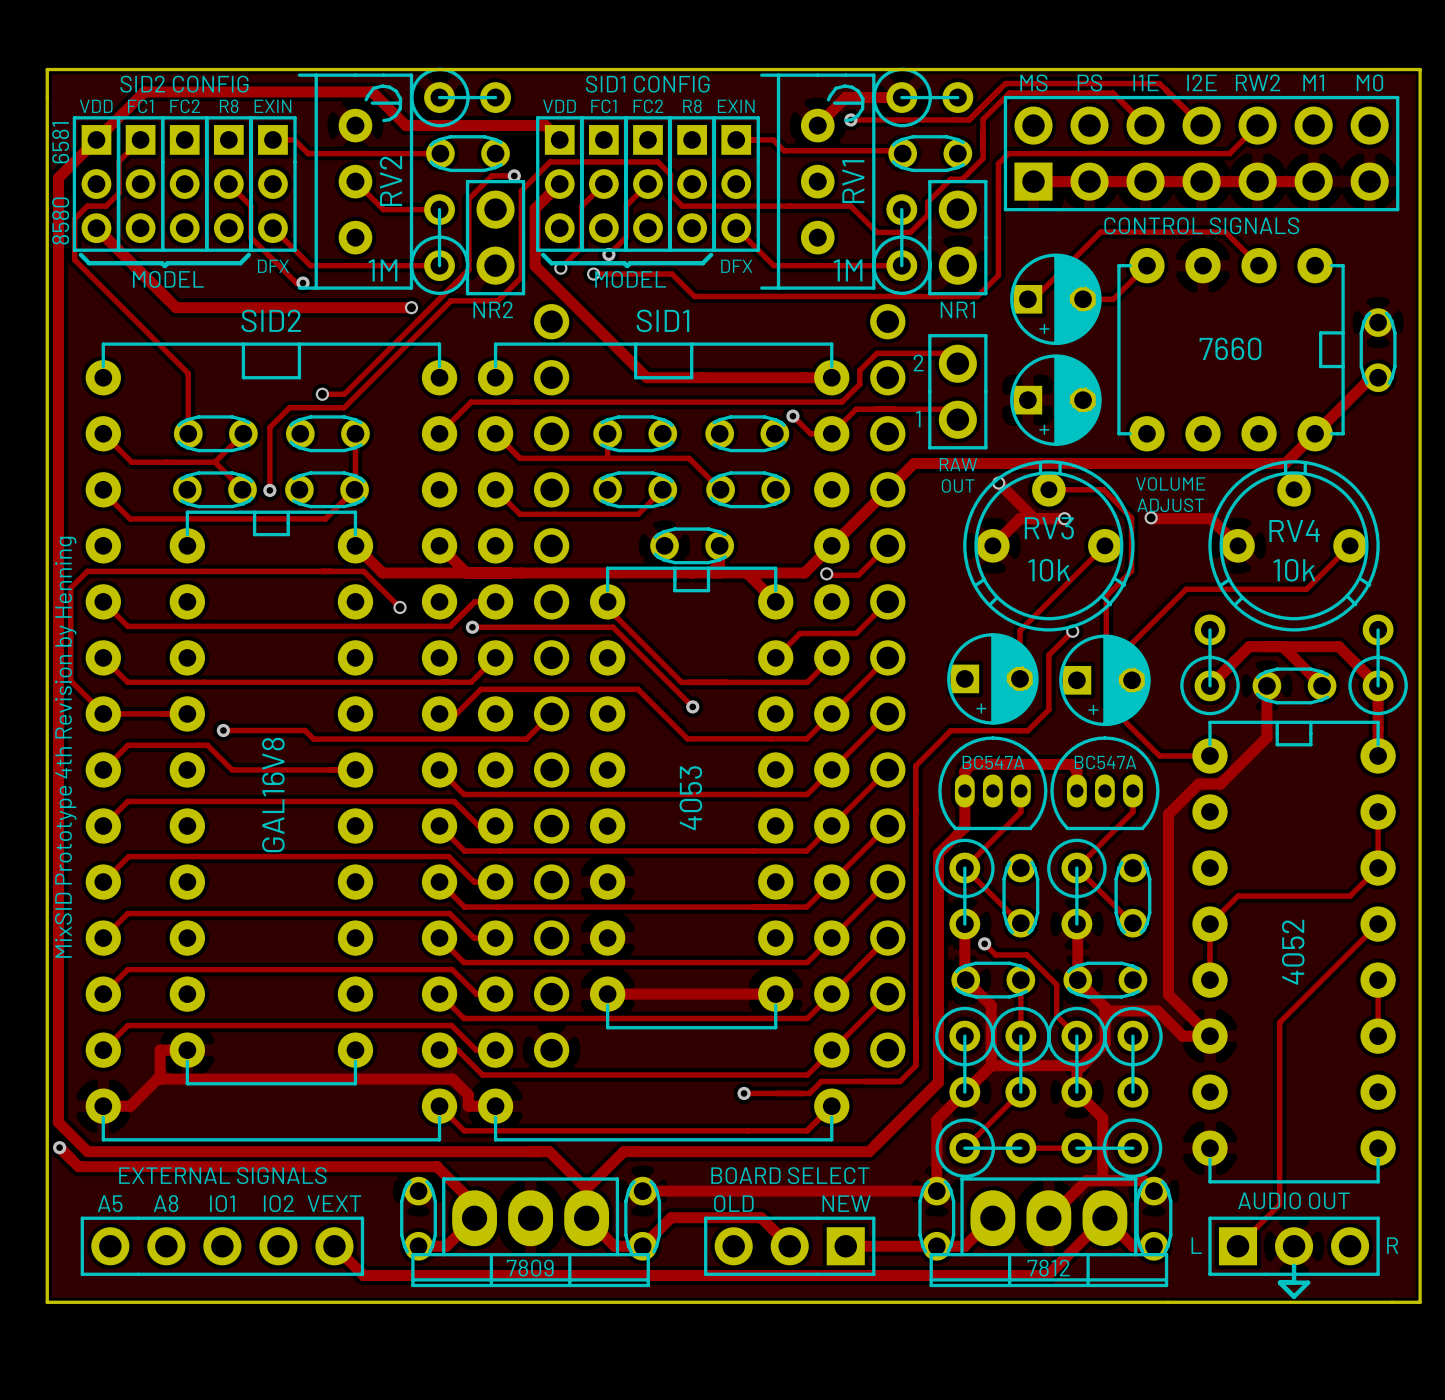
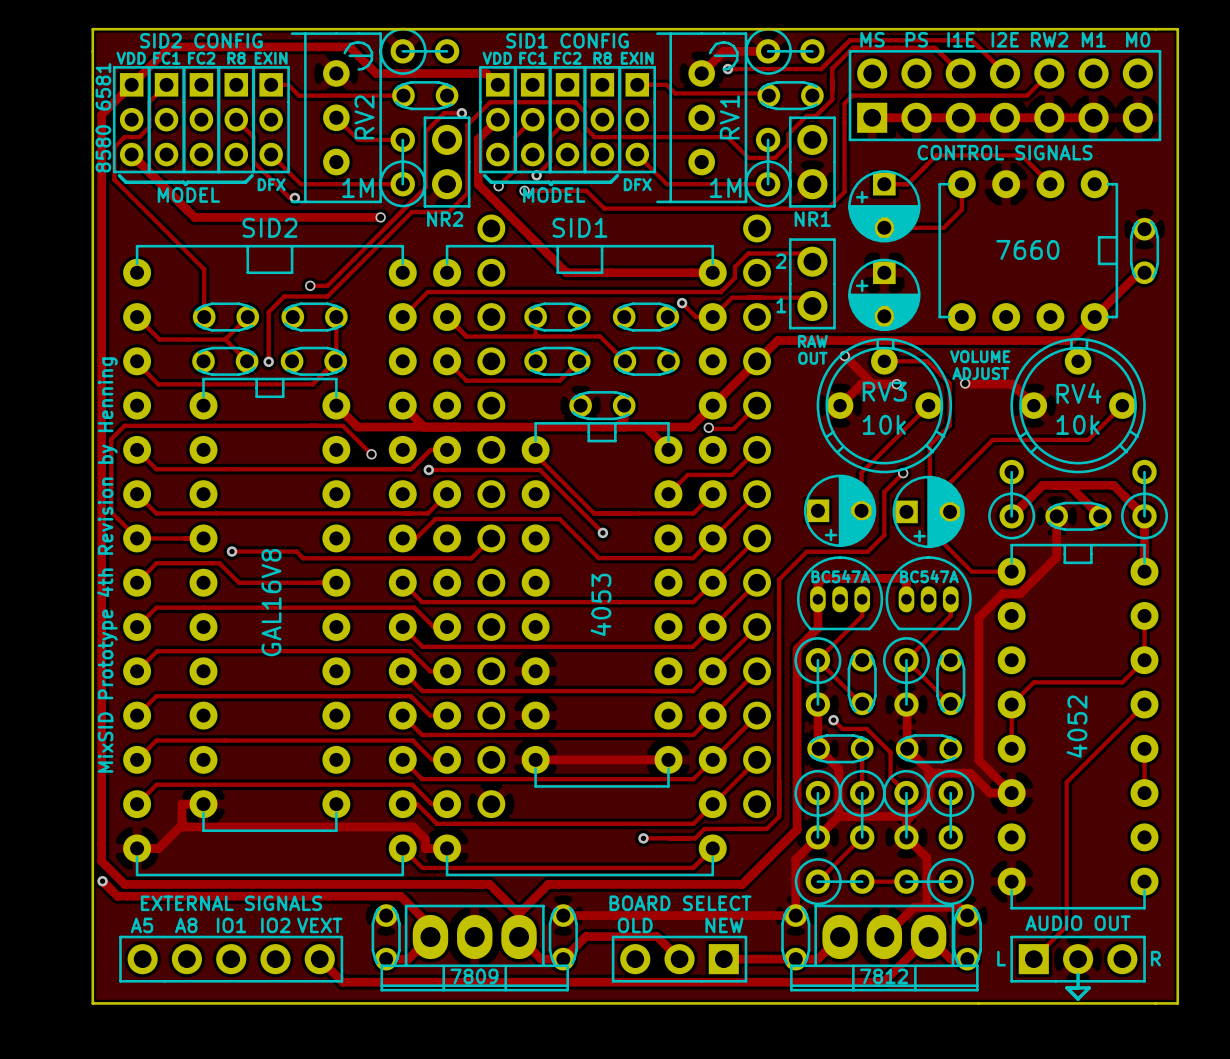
track: (1225, 232) (1100, 232) (1033, 299) (1027, 299) -> (1023, 157) (1021, 155) (936, 155) (907, 184) (884, 184)
track: (1146, 265) (1113, 299) (1083, 299) -> (961, 184) (961, 209) (943, 227) (884, 227)
part rotation: 0° (1055, 299) -> 90° clockwise (884, 206)
part rotation: 0° (1055, 400) -> 90° clockwise (884, 294)

